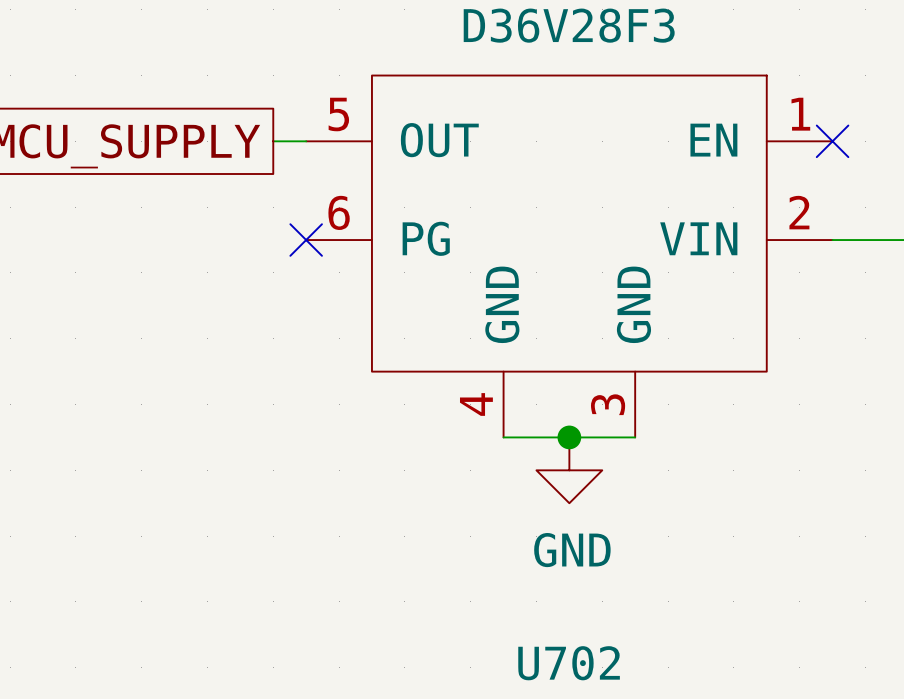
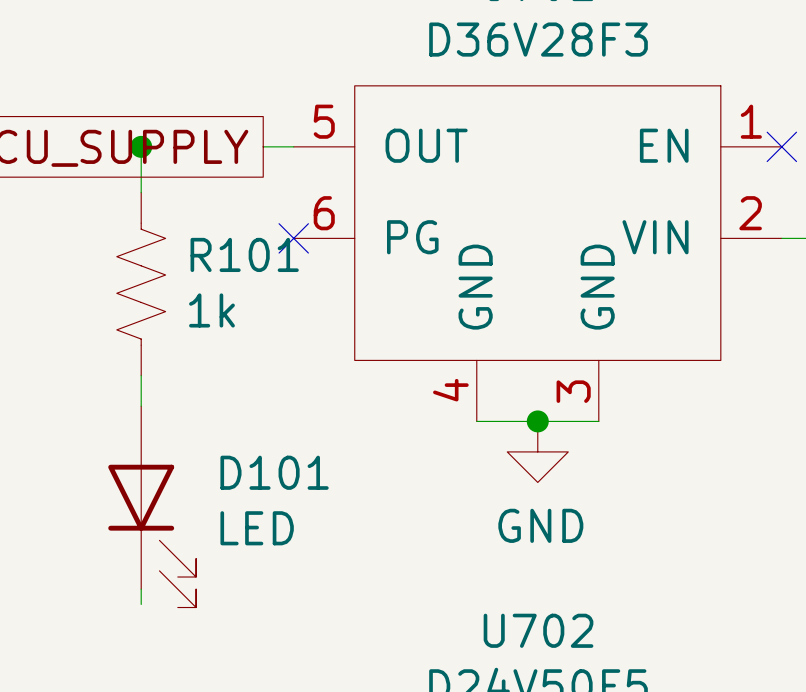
wire: none -> (141, 146) (141, 192)
junction: none -> (141, 146)
R101: none -> 1k (141, 284)
wire: none -> (141, 375) (141, 406)
D101: none -> LED (152, 506)
wire: none -> (141, 589) (141, 604)

